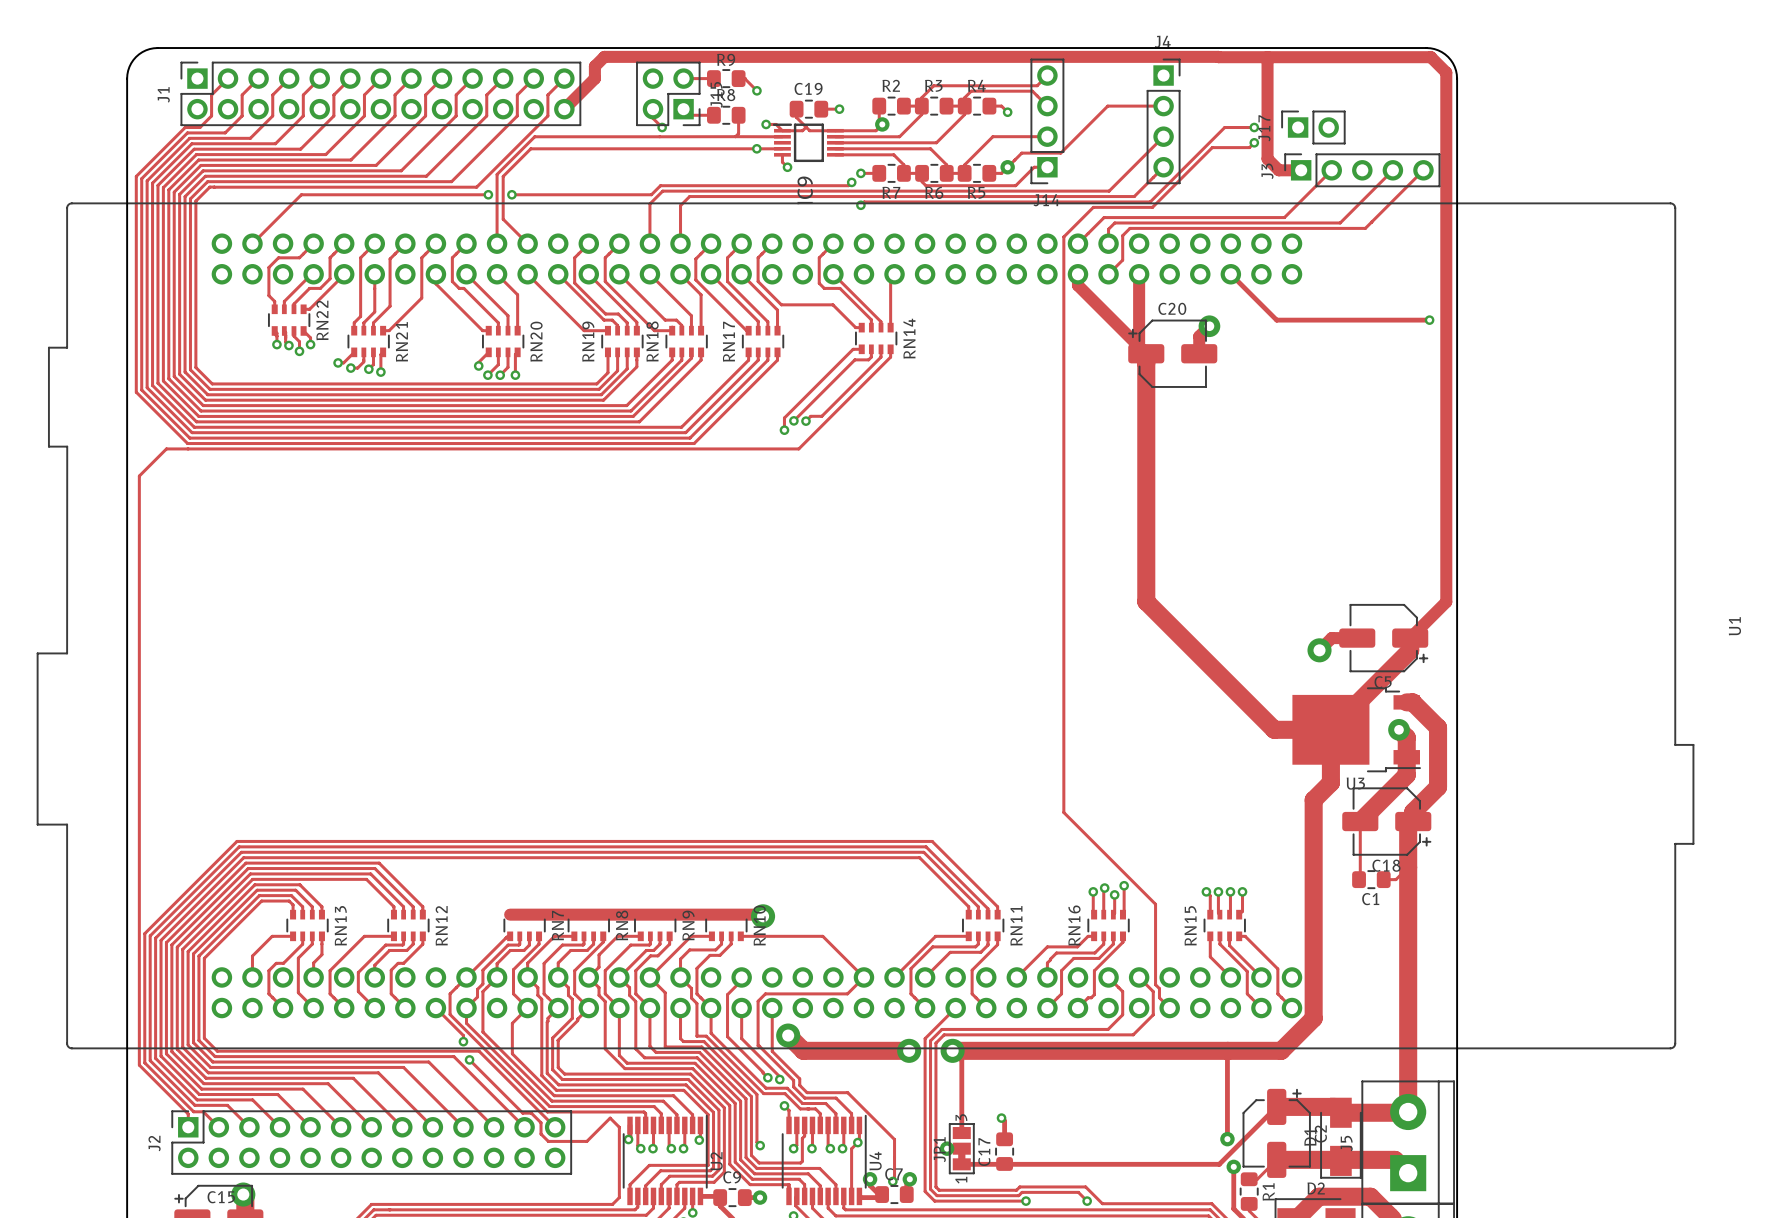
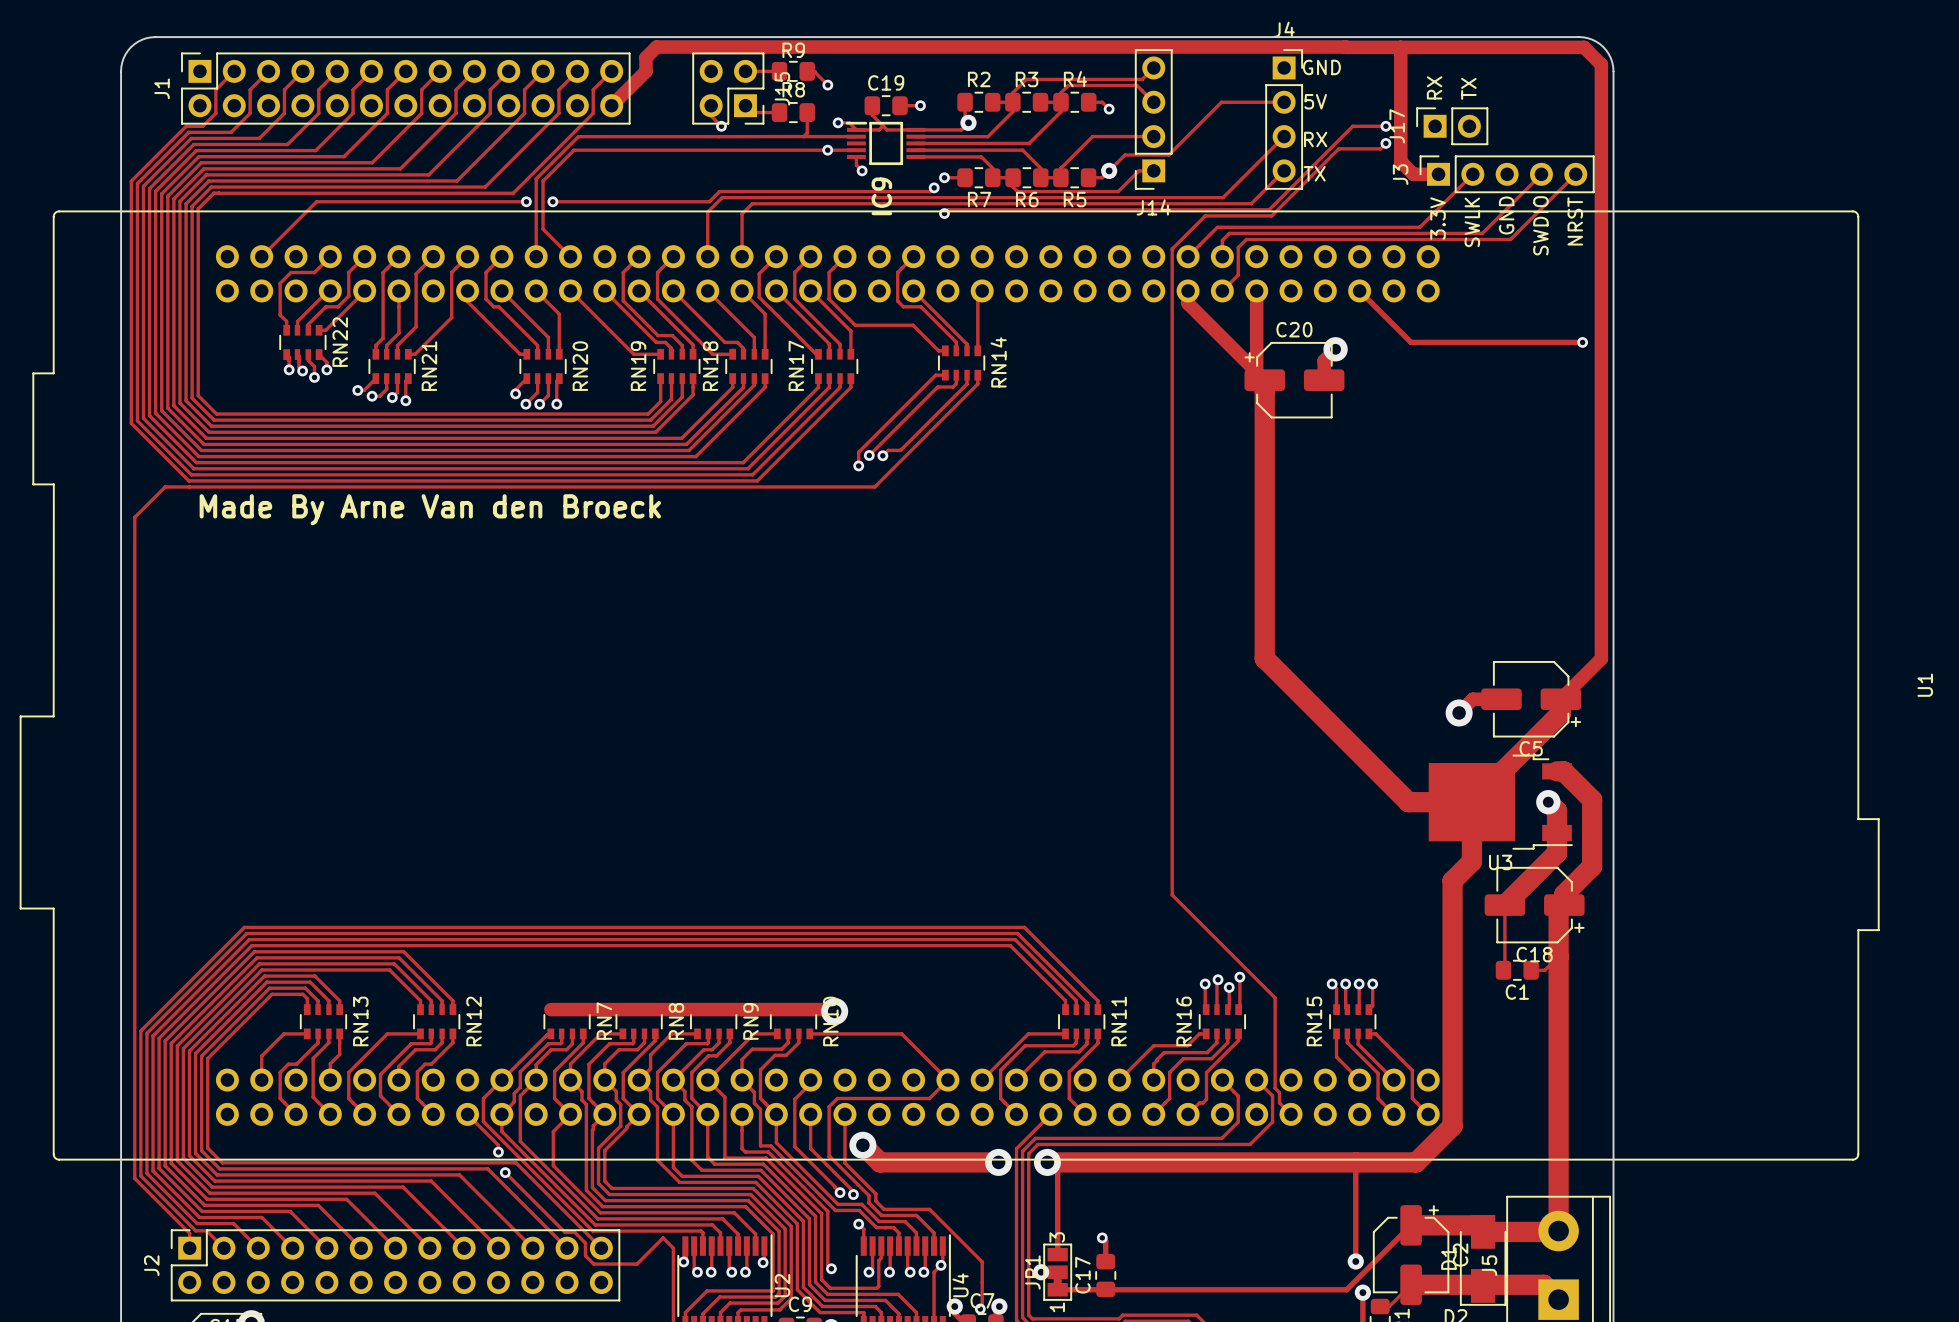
text: none -> GND (1321, 67)
text: none -> RX (1434, 87)
text: none -> TX (1468, 88)
text: none -> 5V (1315, 101)
text: none -> RX (1315, 139)
text: none -> TX (1314, 173)
text: none -> GND (1506, 215)
text: none -> 3.3V (1438, 218)
text: none -> SWLK (1472, 222)
text: none -> NRST (1575, 221)
text: none -> SWDIO (1540, 225)
text: none -> Made By Arne Van den Broeck (430, 509)

